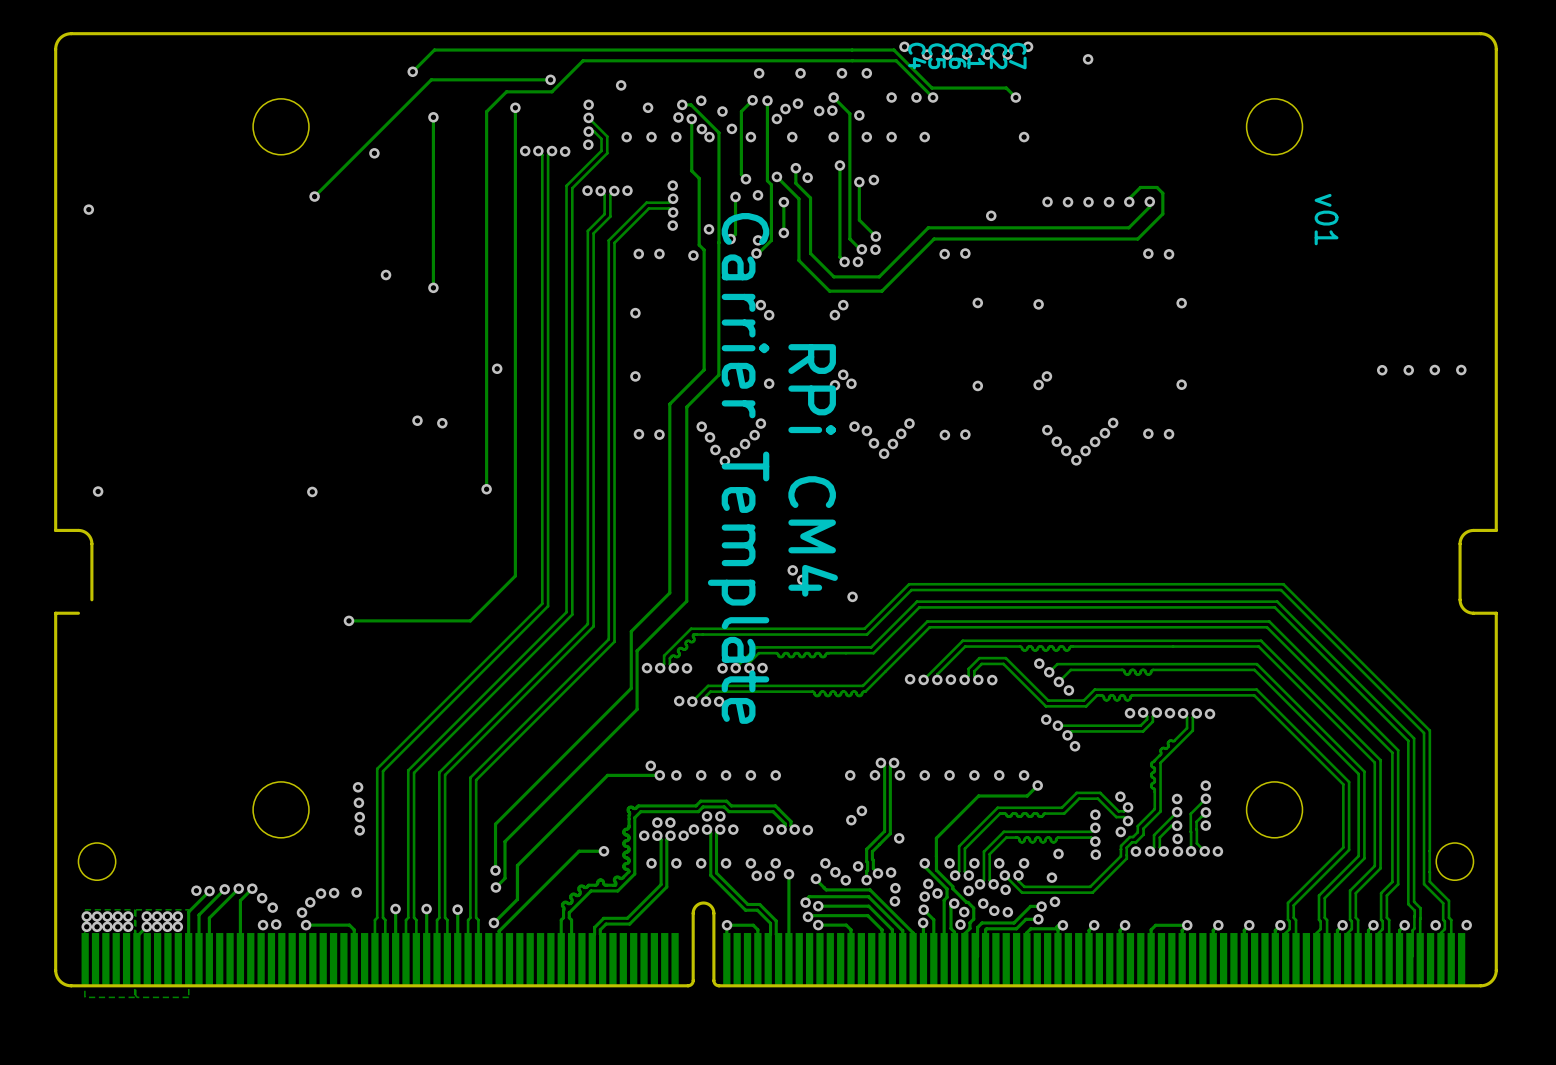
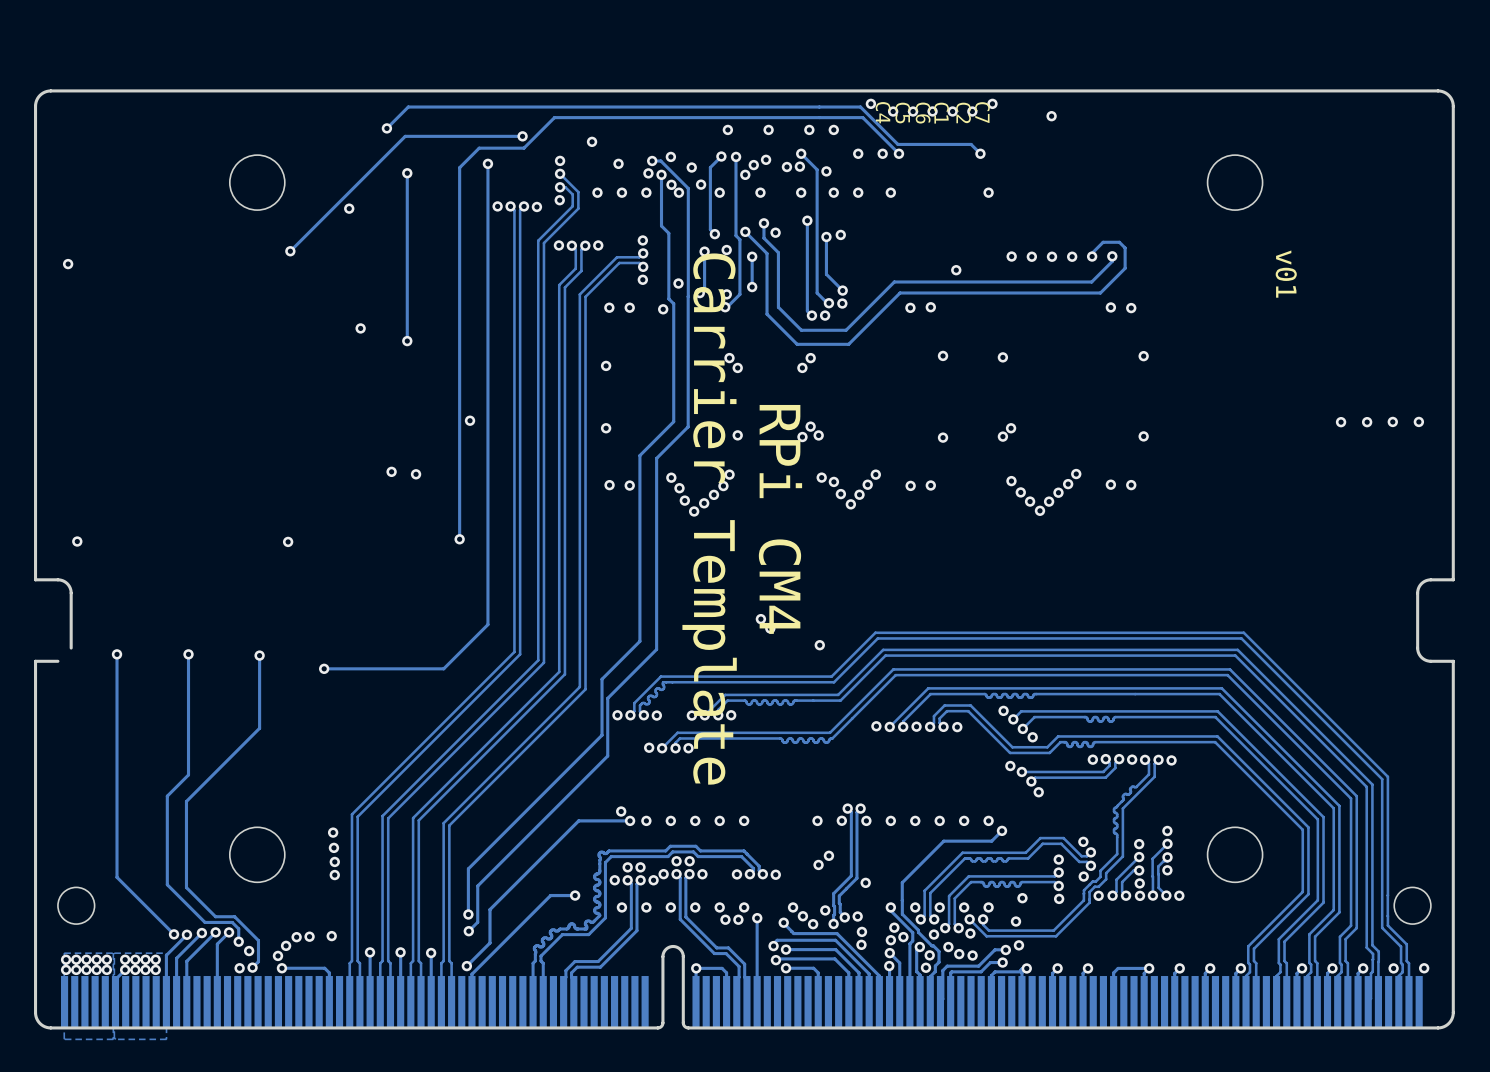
track: none -> (117, 654) (117, 877) (174, 934)
via: none -> (117, 654)
track: none -> (188, 654) (188, 774) (167, 796) (167, 884) (205, 922) (232, 922) (238, 928) (238, 941)
via: none -> (188, 654)
track: none -> (259, 655) (259, 728) (186, 801) (186, 887) (215, 916) (234, 916) (258, 940) (258, 961) (252, 967)
via: none -> (259, 655)

